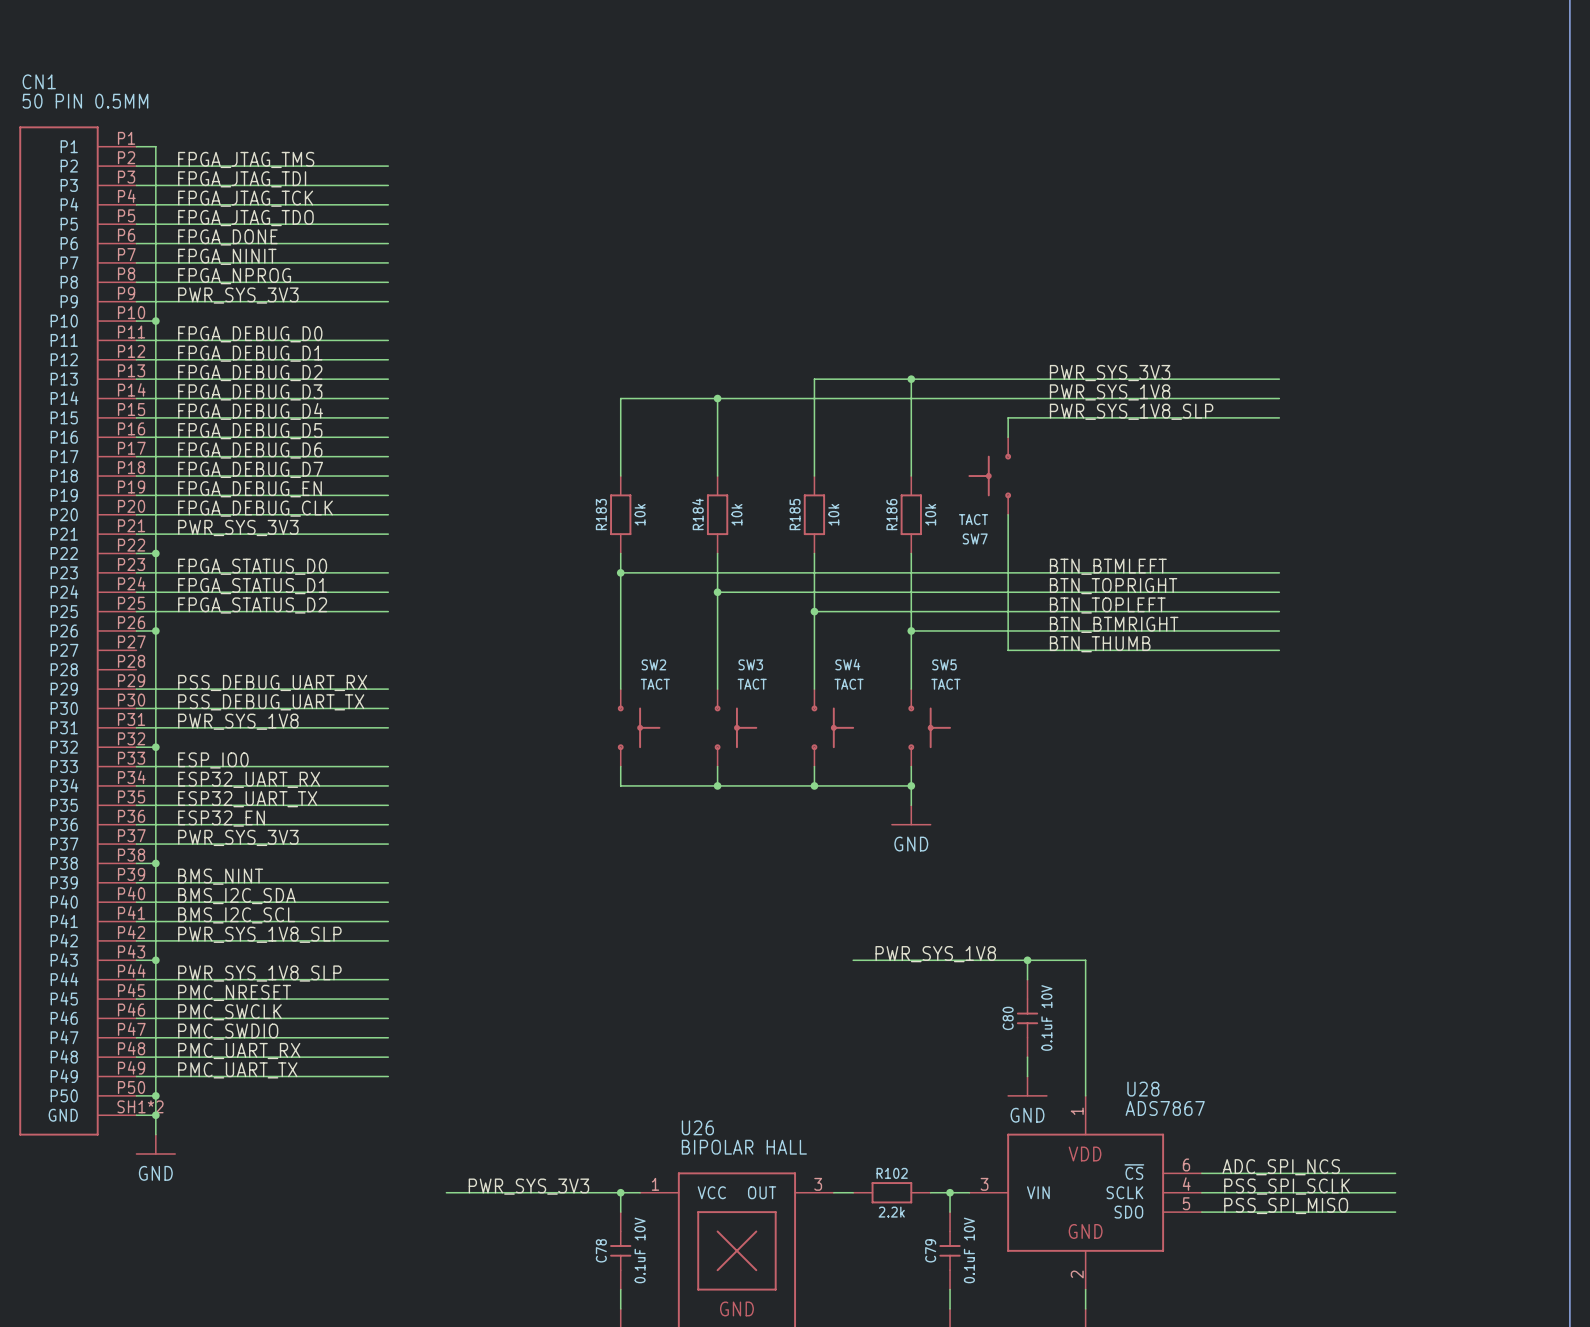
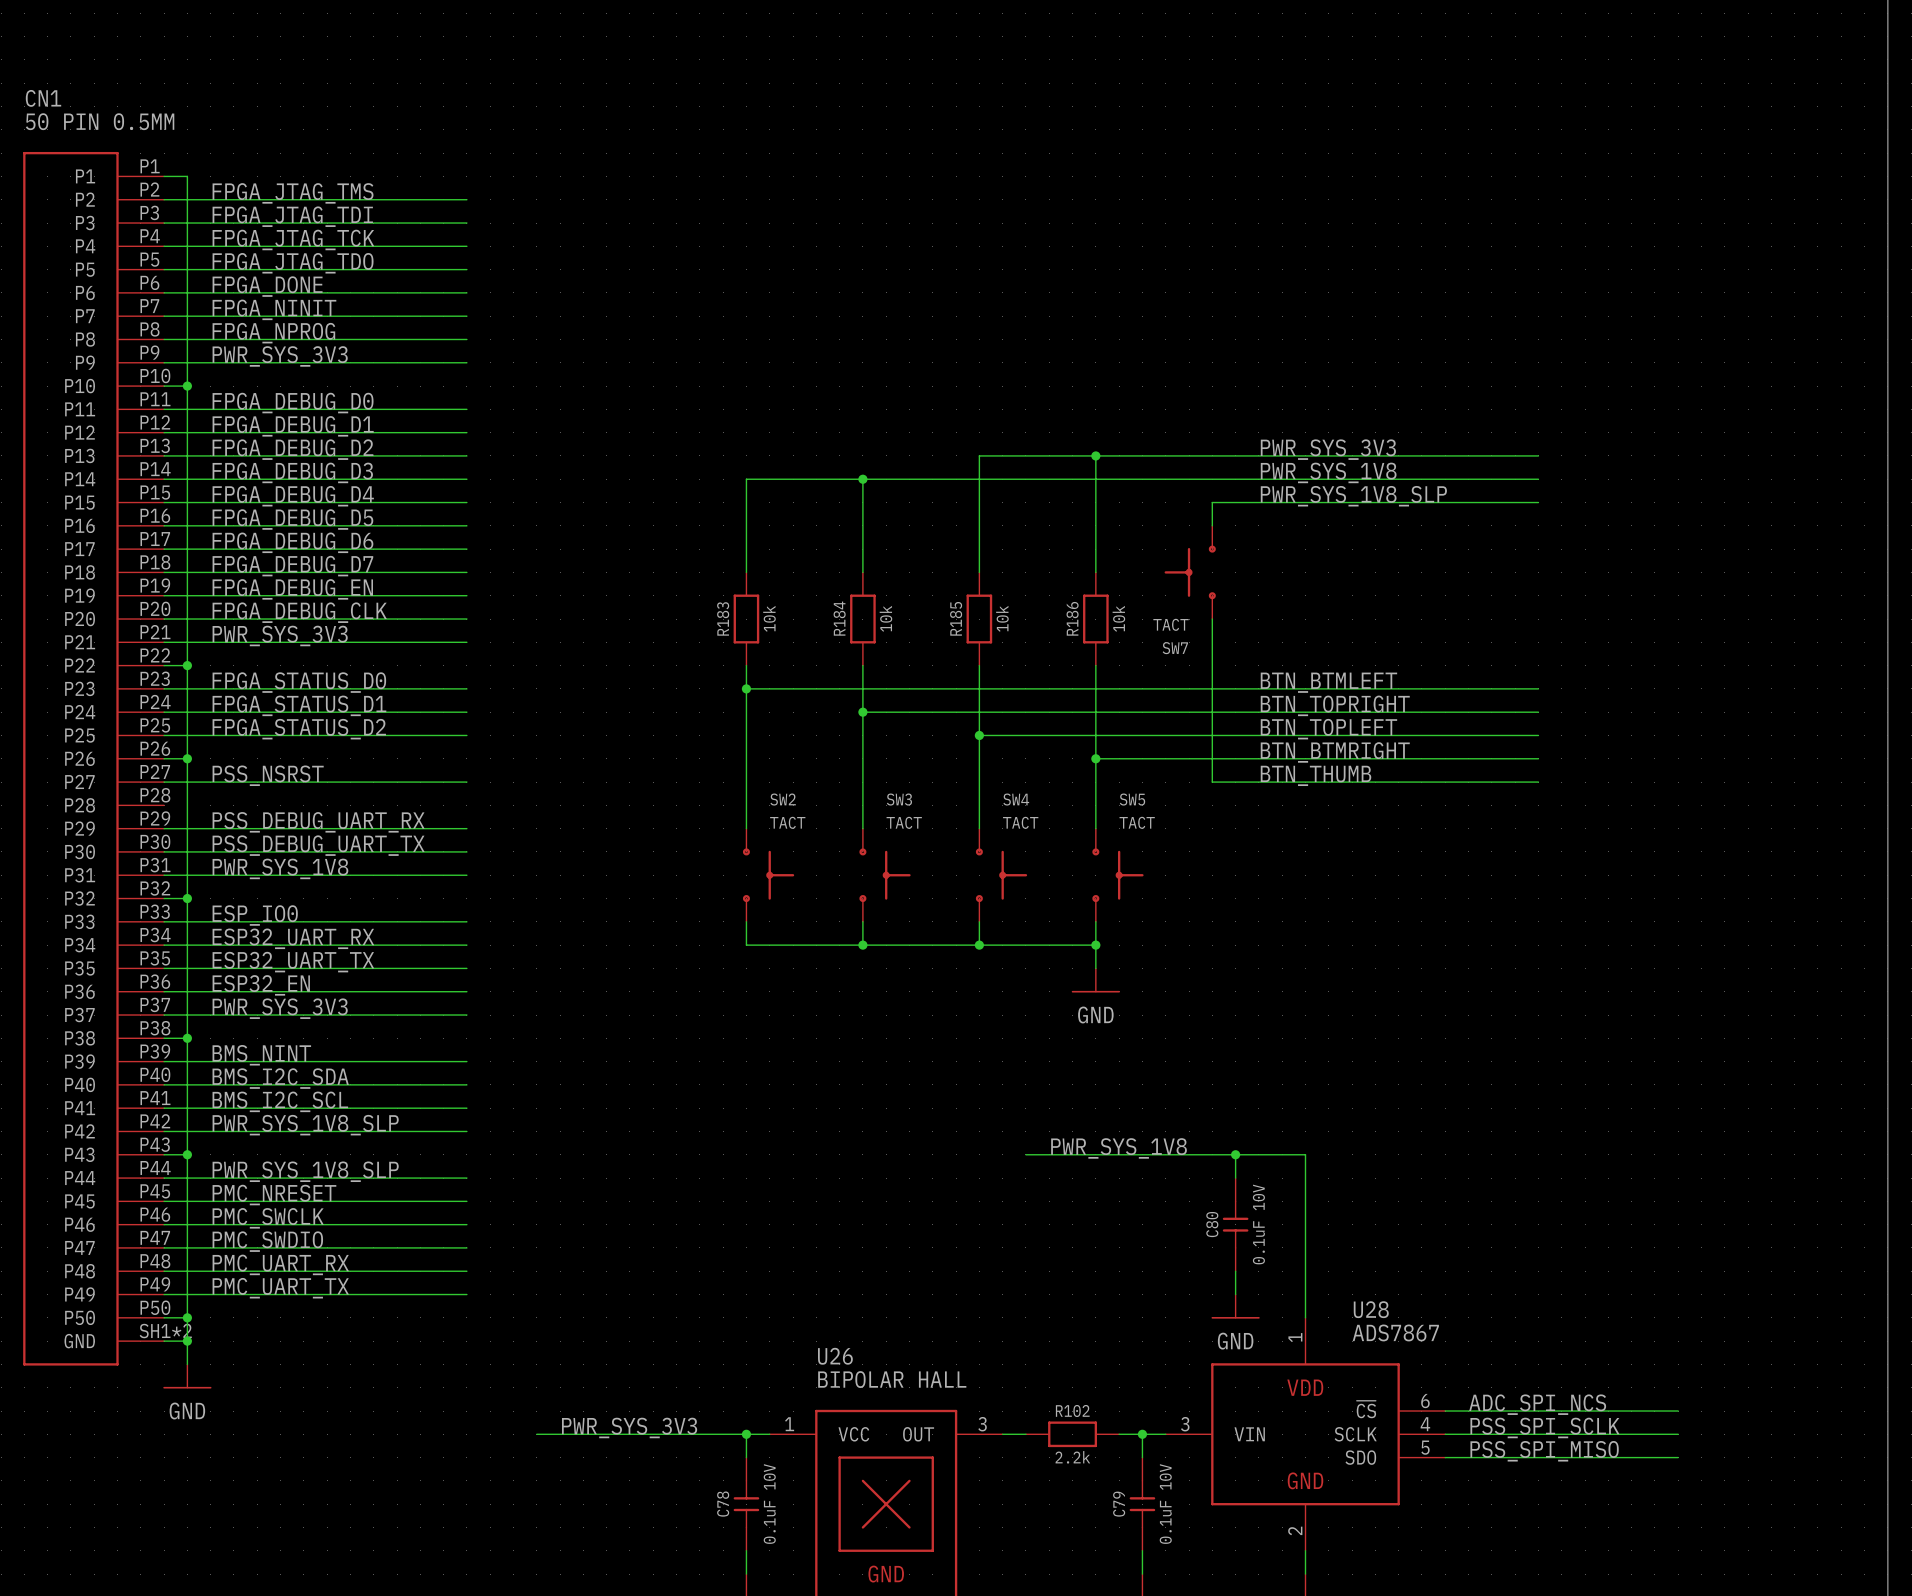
label: none -> PSS_NSRST (268, 775)
wire: none -> (164, 782) (466, 782)

